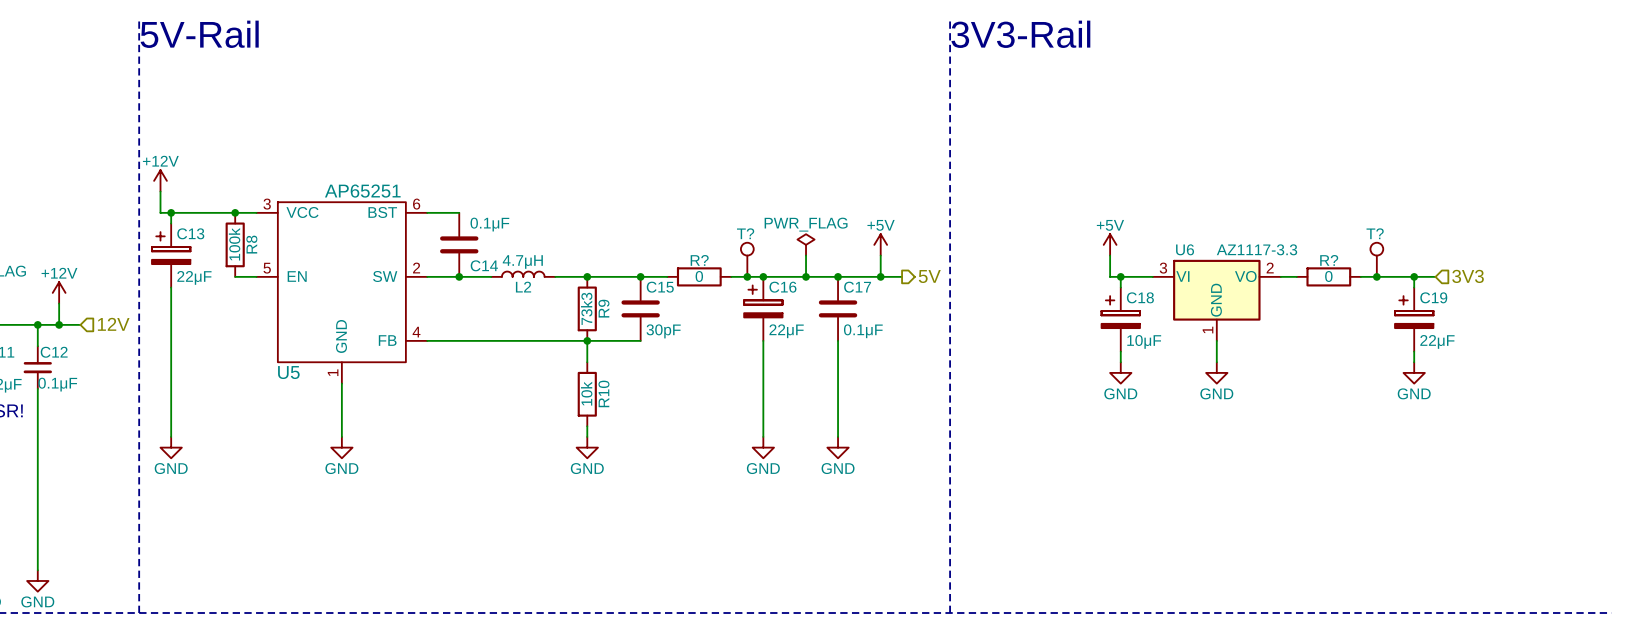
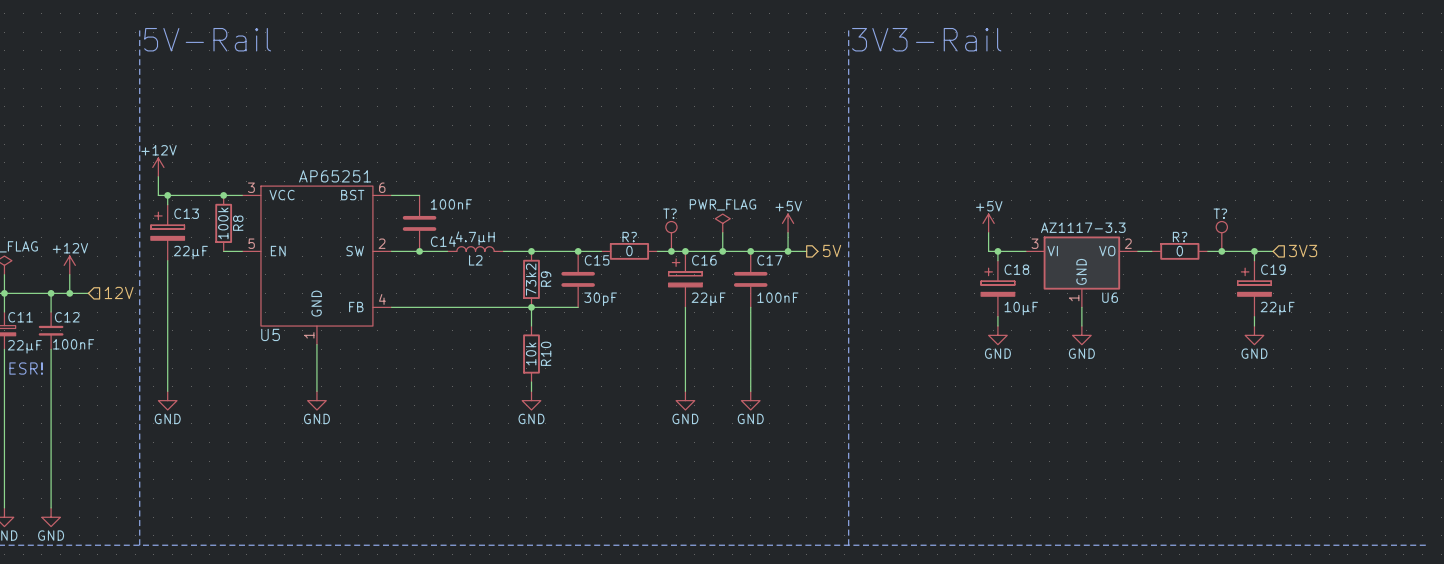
C14 value: 0.1μF (489, 224) -> 100nF (451, 204)
U6 name position: U6 (1185, 249) -> U6 (1110, 297)
U6 value position: AZ1117-3.3 (1257, 249) -> AZ1117-3.3 (1083, 227)
R9 value: 73k3 (586, 308) -> 73k2 (531, 279)
C17 value: 0.1μF (863, 331) -> 100nF (777, 297)
C12 value: 0.1μF (57, 384) -> 100nF (73, 344)

